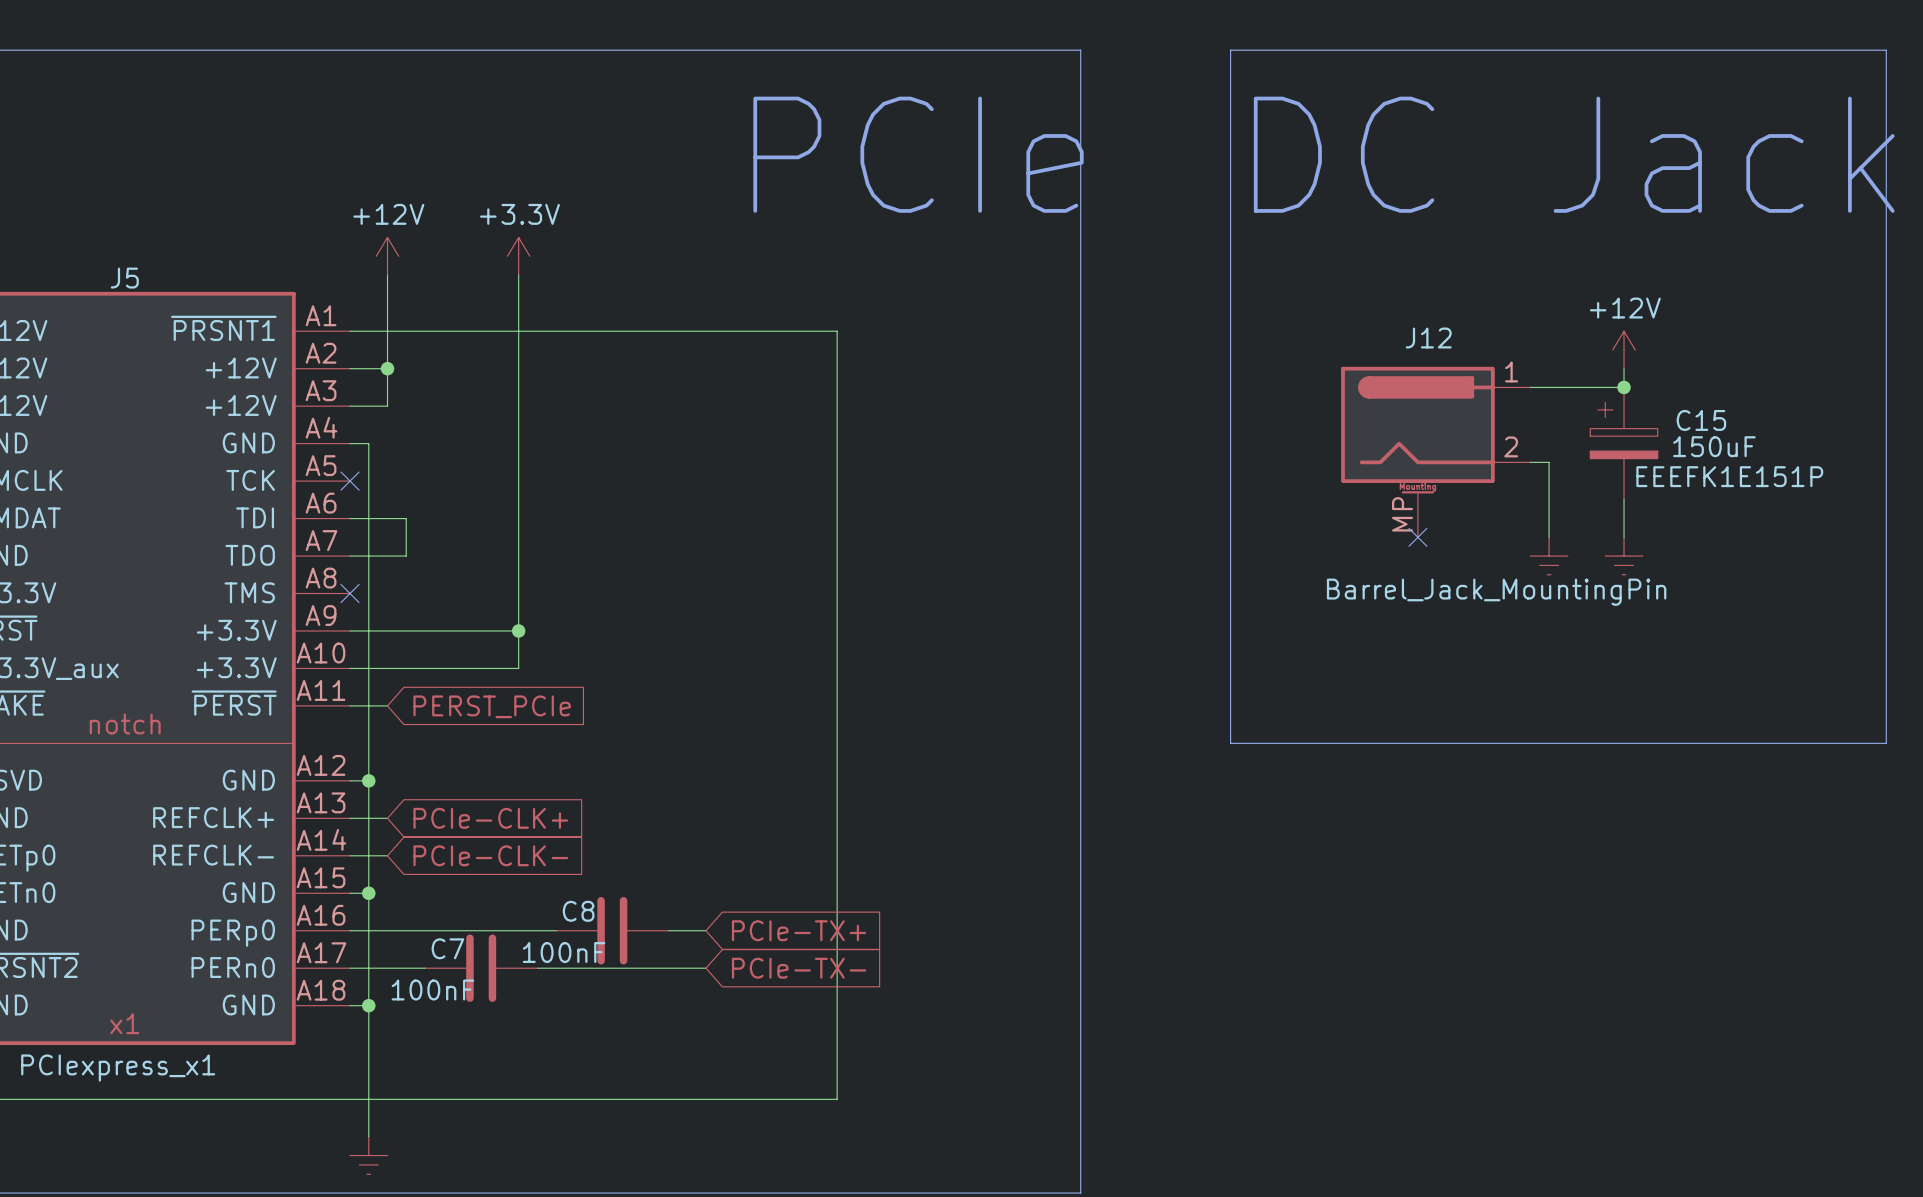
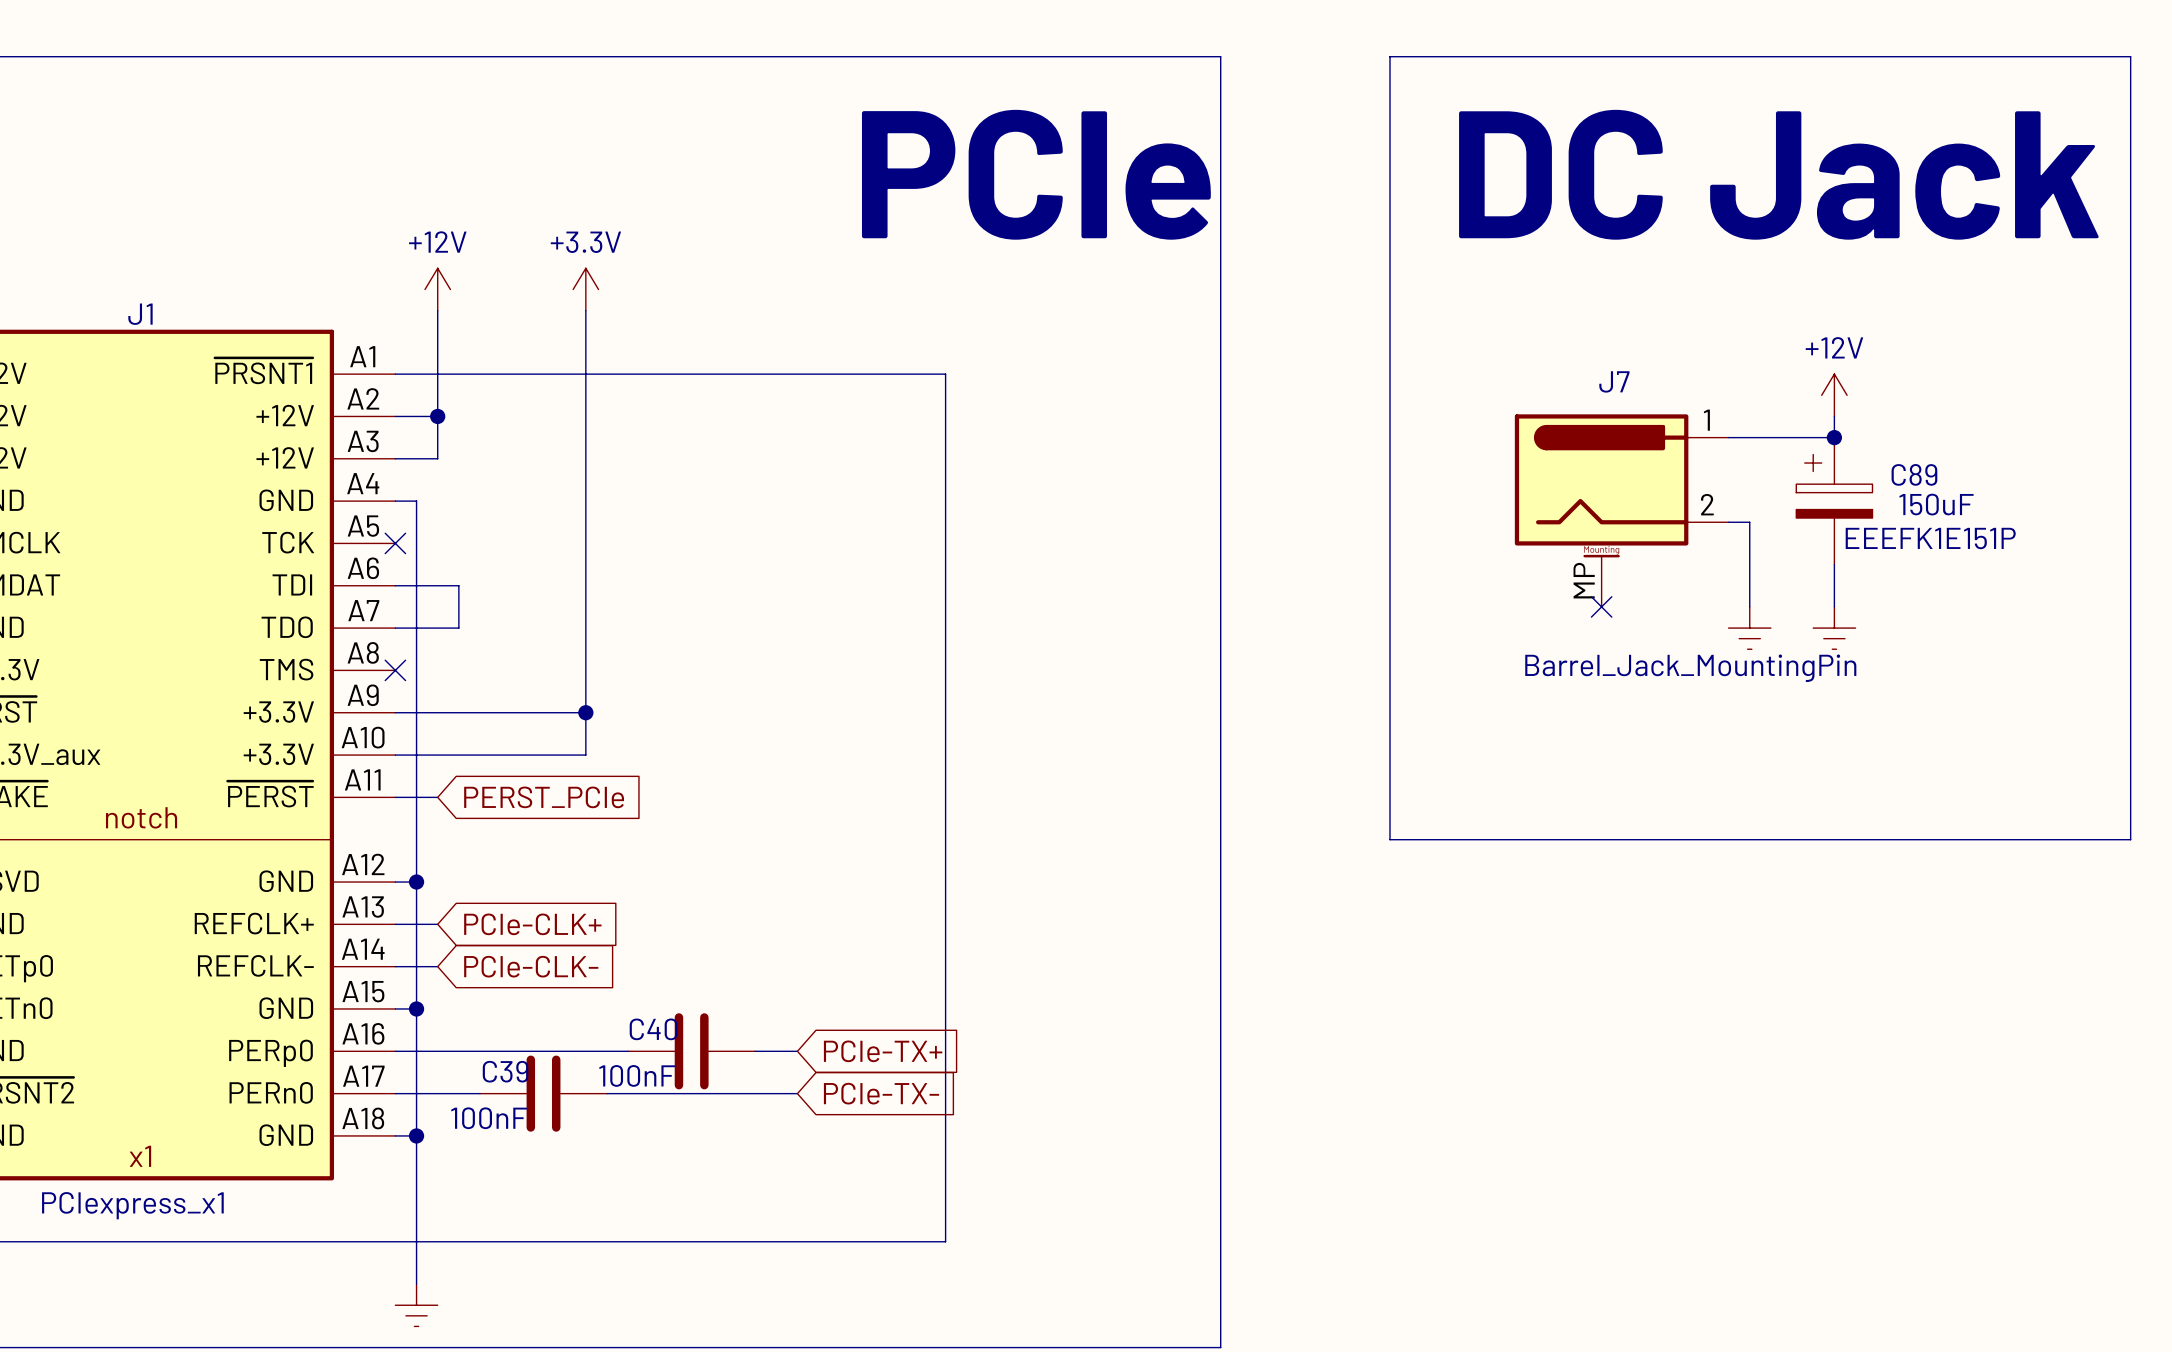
J5 name: J5 (124, 278) -> J1 (140, 314)
J12 name: J12 (1428, 338) -> J7 (1614, 381)
C15 name: C15 (1701, 420) -> C89 (1914, 474)
C8 name: C8 (578, 911) -> C40 (653, 1029)
C7 name: C7 (447, 948) -> C39 (505, 1071)

